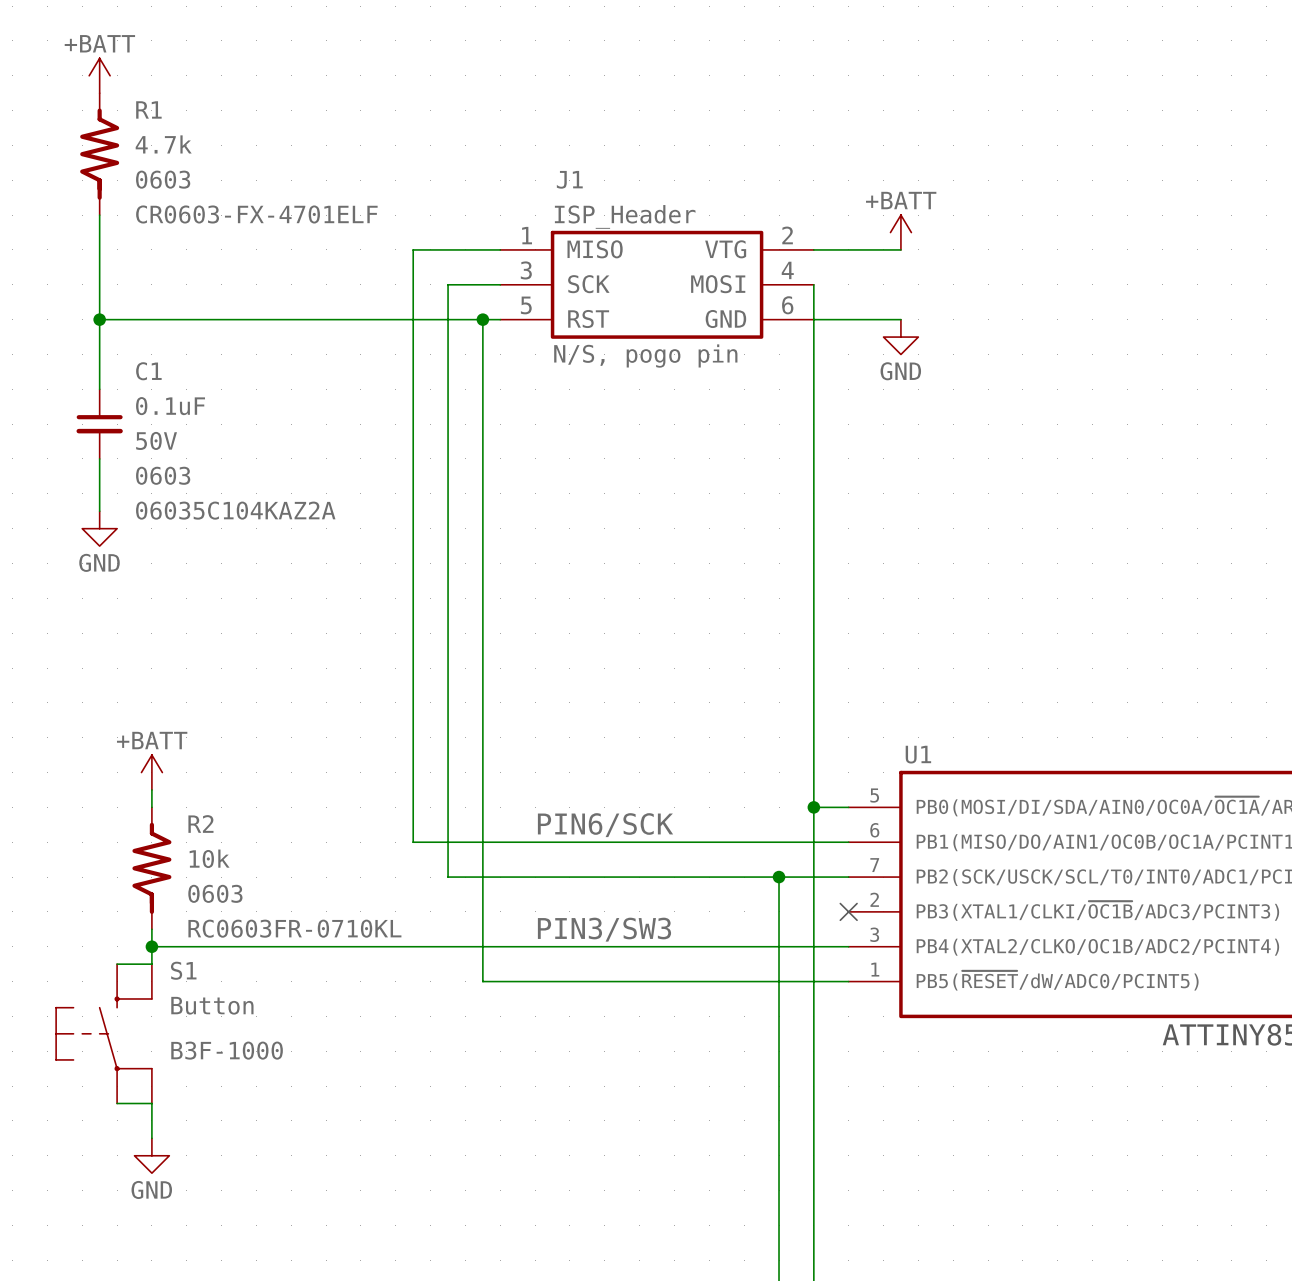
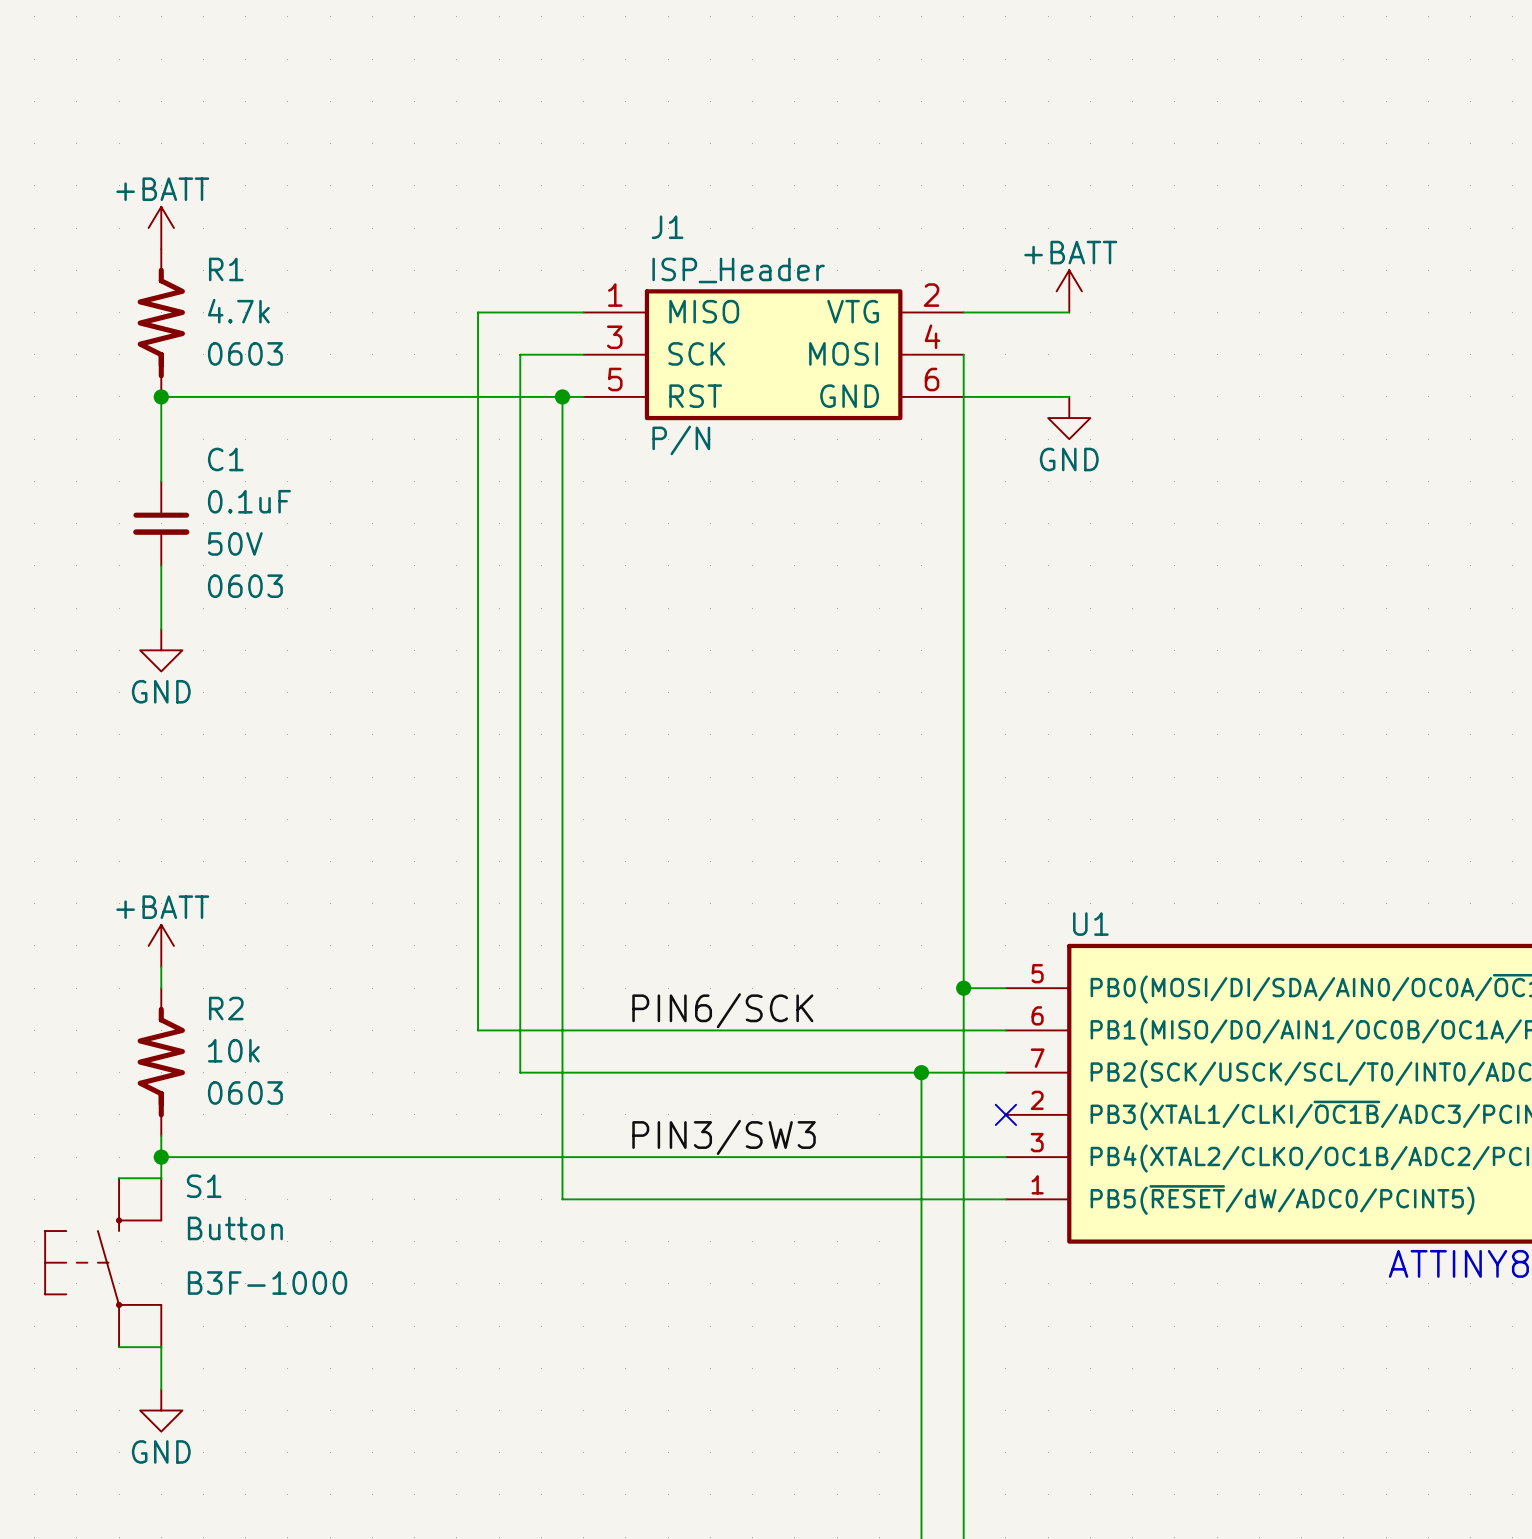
power symbol position: +BATT (99, 75) -> +BATT (161, 228)
R1 position: (99, 154) -> (161, 323)
R1 text: CR0603-FX-4701ELF (256, 214) -> none
wire: (99, 215) (99, 389) -> none
wire: (99, 319) (151, 319) -> (161, 481) (161, 396)
junction position: (99, 319) -> (161, 396)
J1 text: N/S, pogo pin (645, 356) -> P/N (681, 440)
C1 position: (99, 424) -> (161, 523)
wire: (99, 458) (99, 511) -> (161, 565) (161, 629)
C1 text: 06035C104KAZ2A (235, 510) -> none
power symbol position: GND (99, 528) -> GND (161, 650)
R2 text: RC0603FR-0710KL (294, 928) -> none

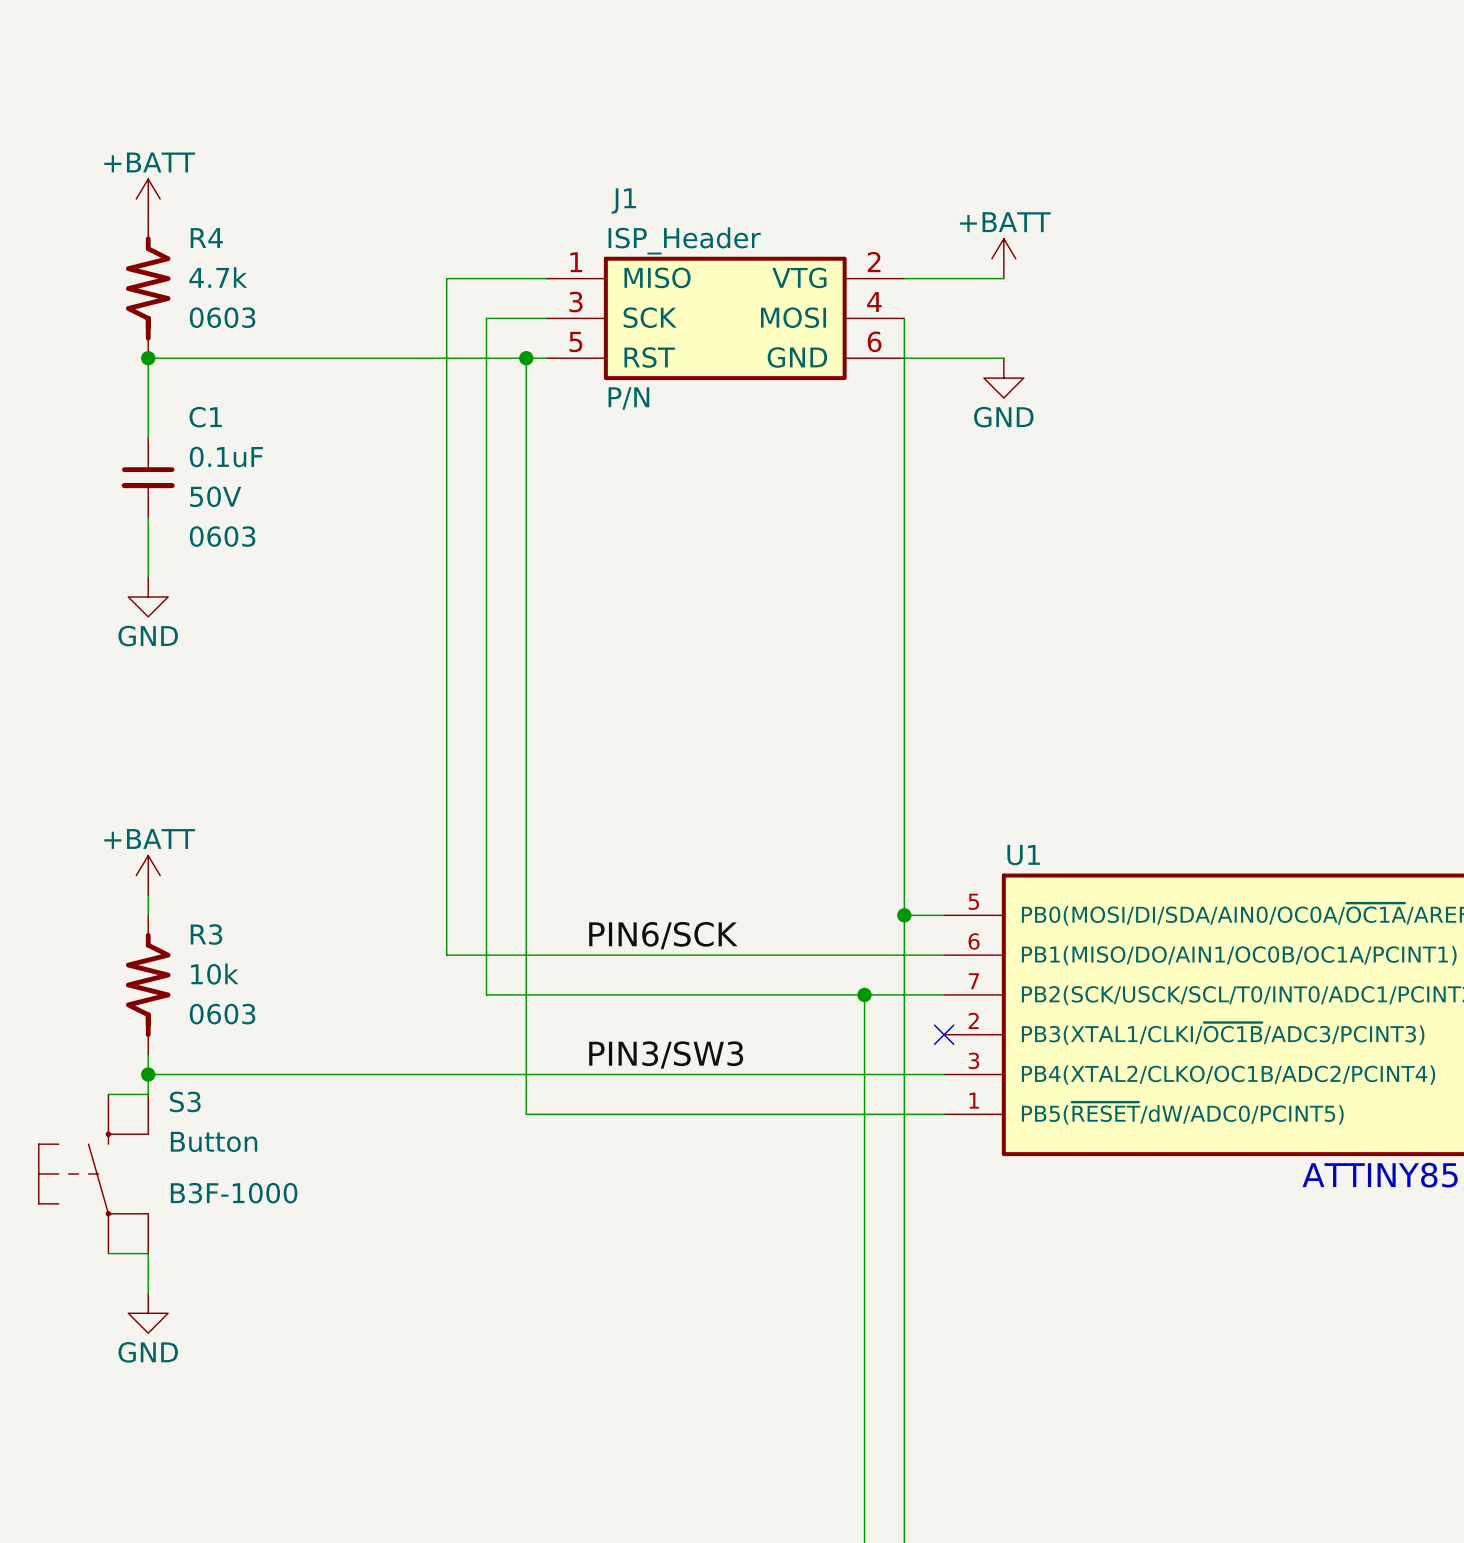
R1 name: R1 (226, 269) -> R4 (206, 238)
R2 name: R2 (226, 1008) -> R3 (206, 934)
S1 name: S1 (204, 1186) -> S3 (185, 1101)

